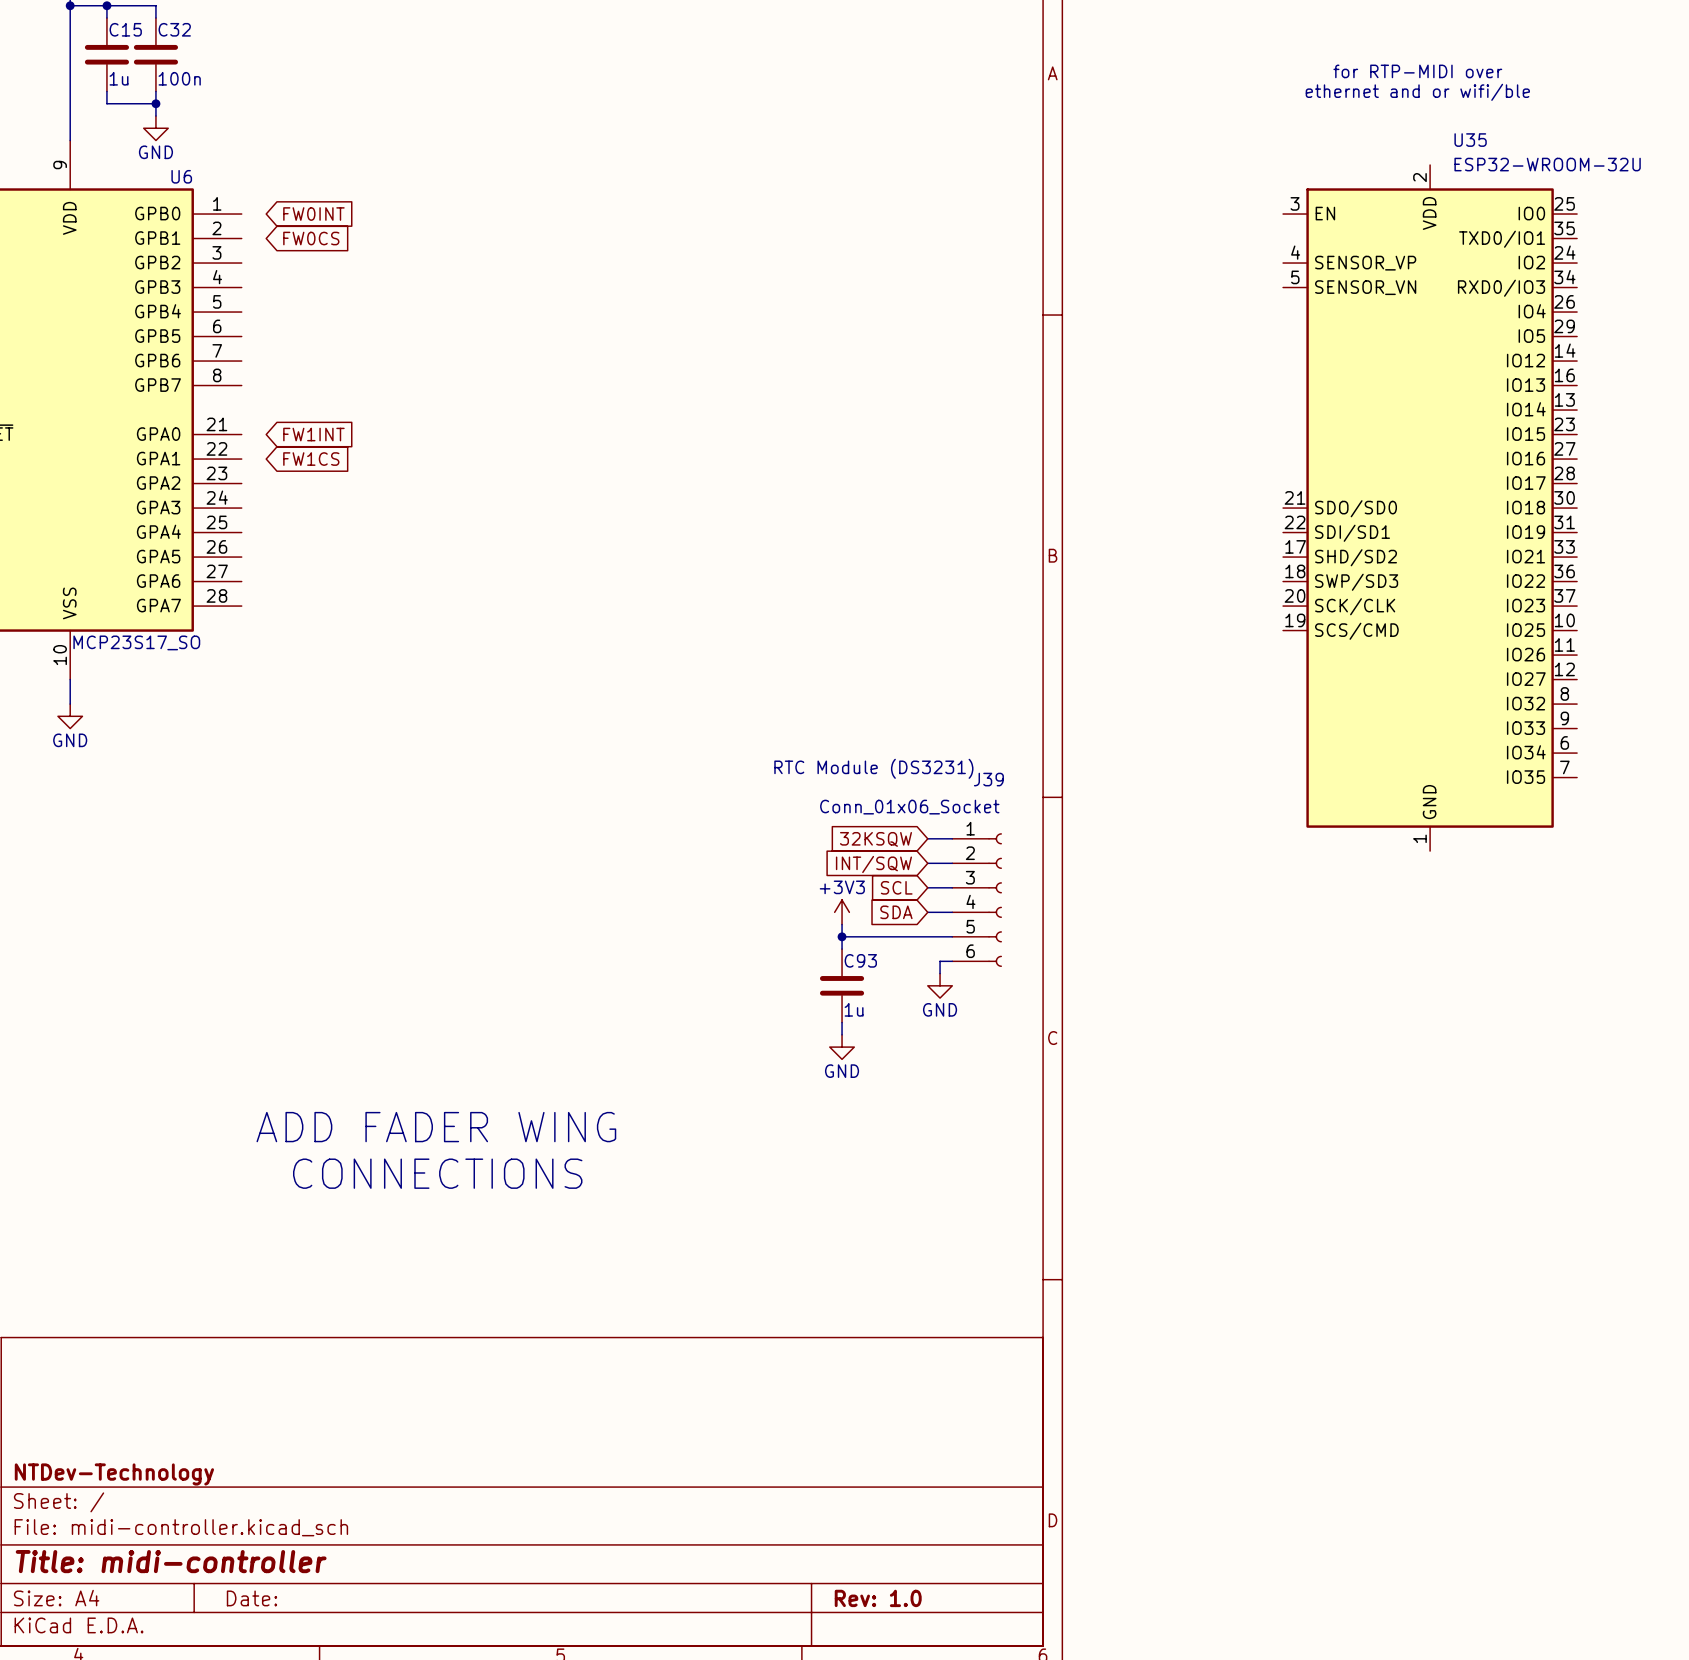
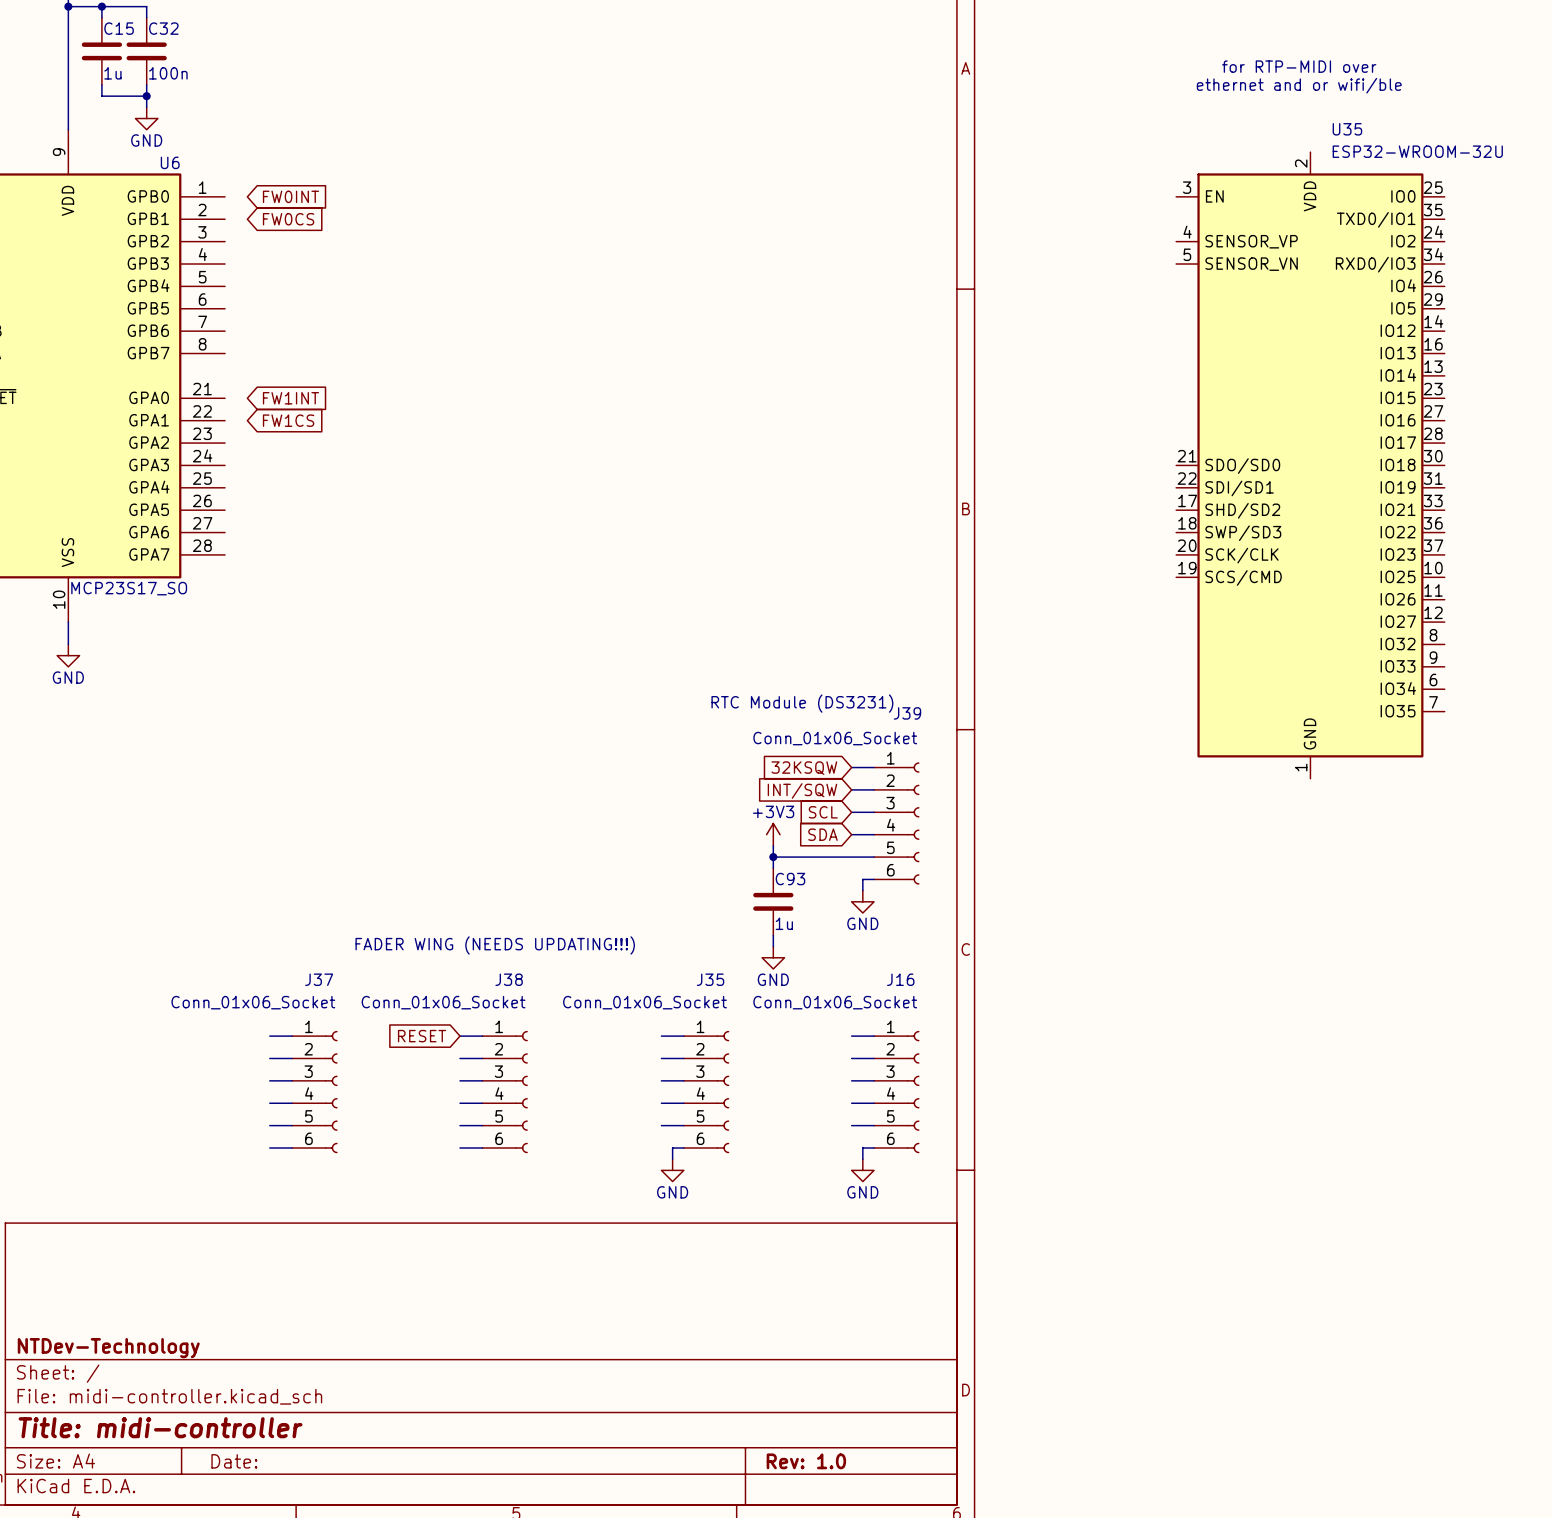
text: none -> FADER WING (NEEDS UPDATING!!!) (495, 945)
text: ADD FADER WING (436, 1127) -> none
wire: none -> (269, 1036) (292, 1036)
global label: none -> RESET (422, 1036)
wire: none -> (460, 1036) (482, 1036)
wire: none -> (661, 1036) (683, 1036)
wire: none -> (851, 1036) (874, 1036)
wire: none -> (269, 1058) (292, 1058)
wire: none -> (460, 1058) (482, 1058)
wire: none -> (661, 1058) (683, 1058)
wire: none -> (851, 1058) (874, 1058)
text: CONNECTIONS (437, 1173) -> none
wire: none -> (269, 1080) (292, 1080)
wire: none -> (460, 1080) (482, 1080)
wire: none -> (661, 1080) (683, 1080)
wire: none -> (851, 1080) (874, 1080)
J37: none -> Conn_01x06_Socket (314, 1092)
J38: none -> Conn_01x06_Socket (505, 1092)
J35: none -> Conn_01x06_Socket (706, 1092)
J16: none -> Conn_01x06_Socket (896, 1092)
wire: none -> (269, 1103) (292, 1103)
wire: none -> (460, 1103) (482, 1103)
wire: none -> (661, 1103) (683, 1103)
wire: none -> (851, 1103) (874, 1103)
wire: none -> (269, 1125) (292, 1125)
wire: none -> (460, 1125) (482, 1125)
wire: none -> (661, 1125) (683, 1125)
wire: none -> (851, 1125) (874, 1125)
wire: none -> (269, 1148) (292, 1148)
wire: none -> (460, 1148) (482, 1148)
wire: none -> (683, 1148) (672, 1148) (672, 1159)
wire: none -> (874, 1148) (862, 1148) (862, 1159)
power symbol: none -> GND (672, 1170)
power symbol: none -> GND (862, 1170)

